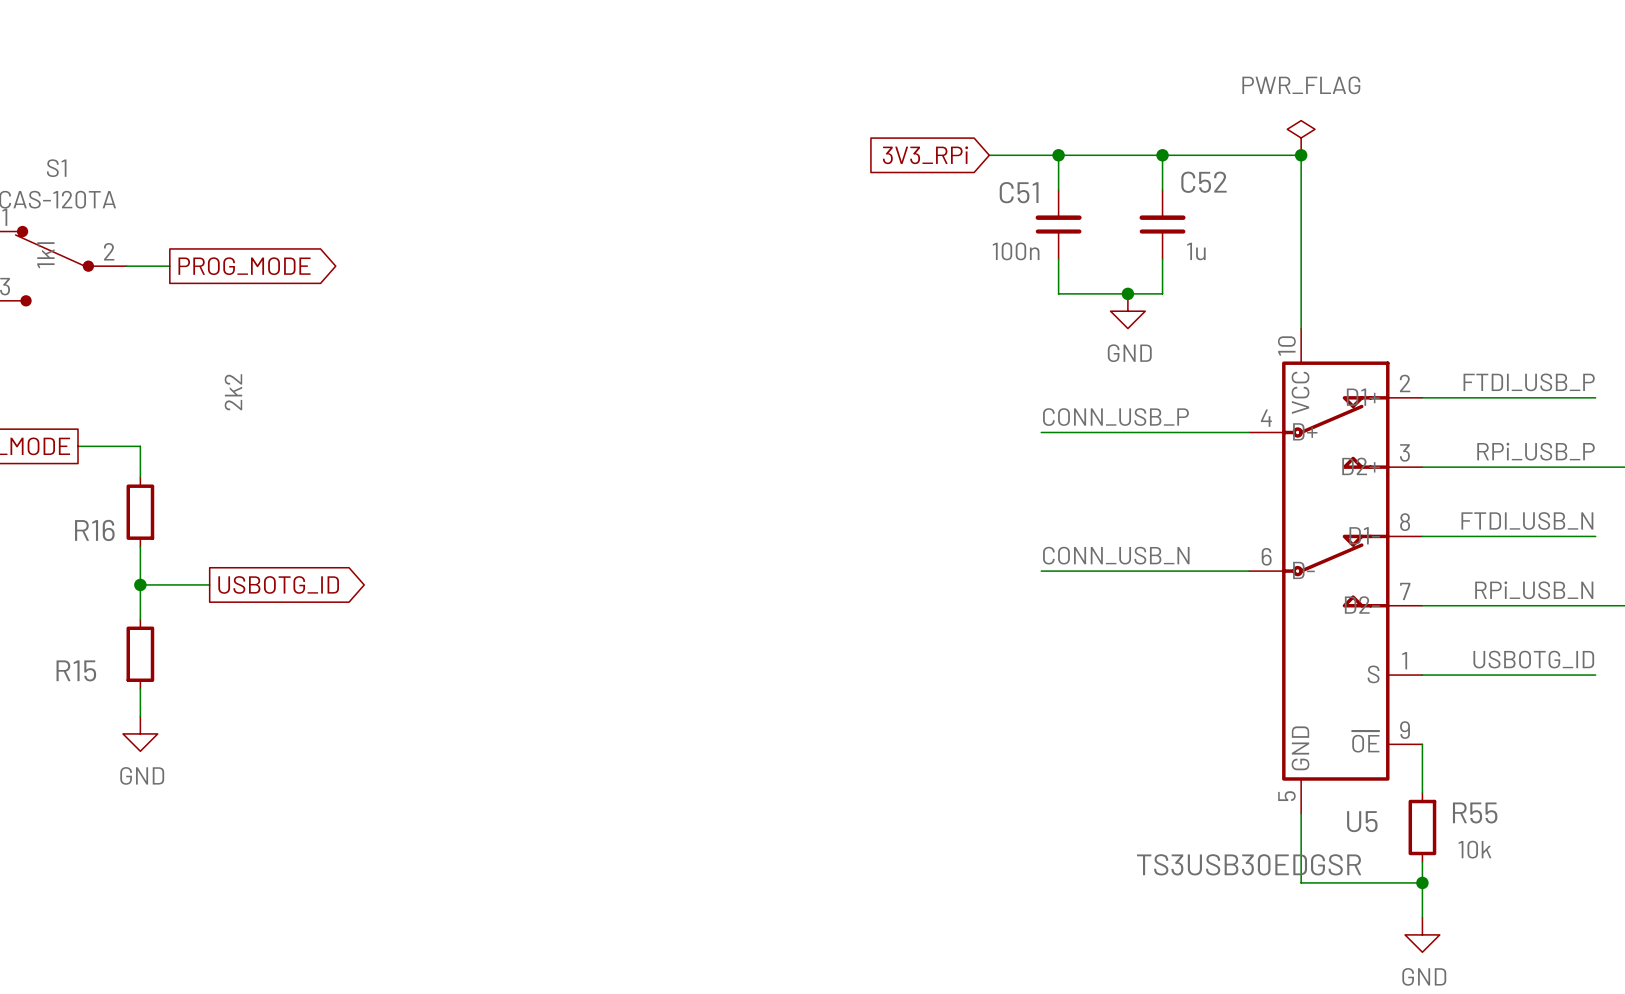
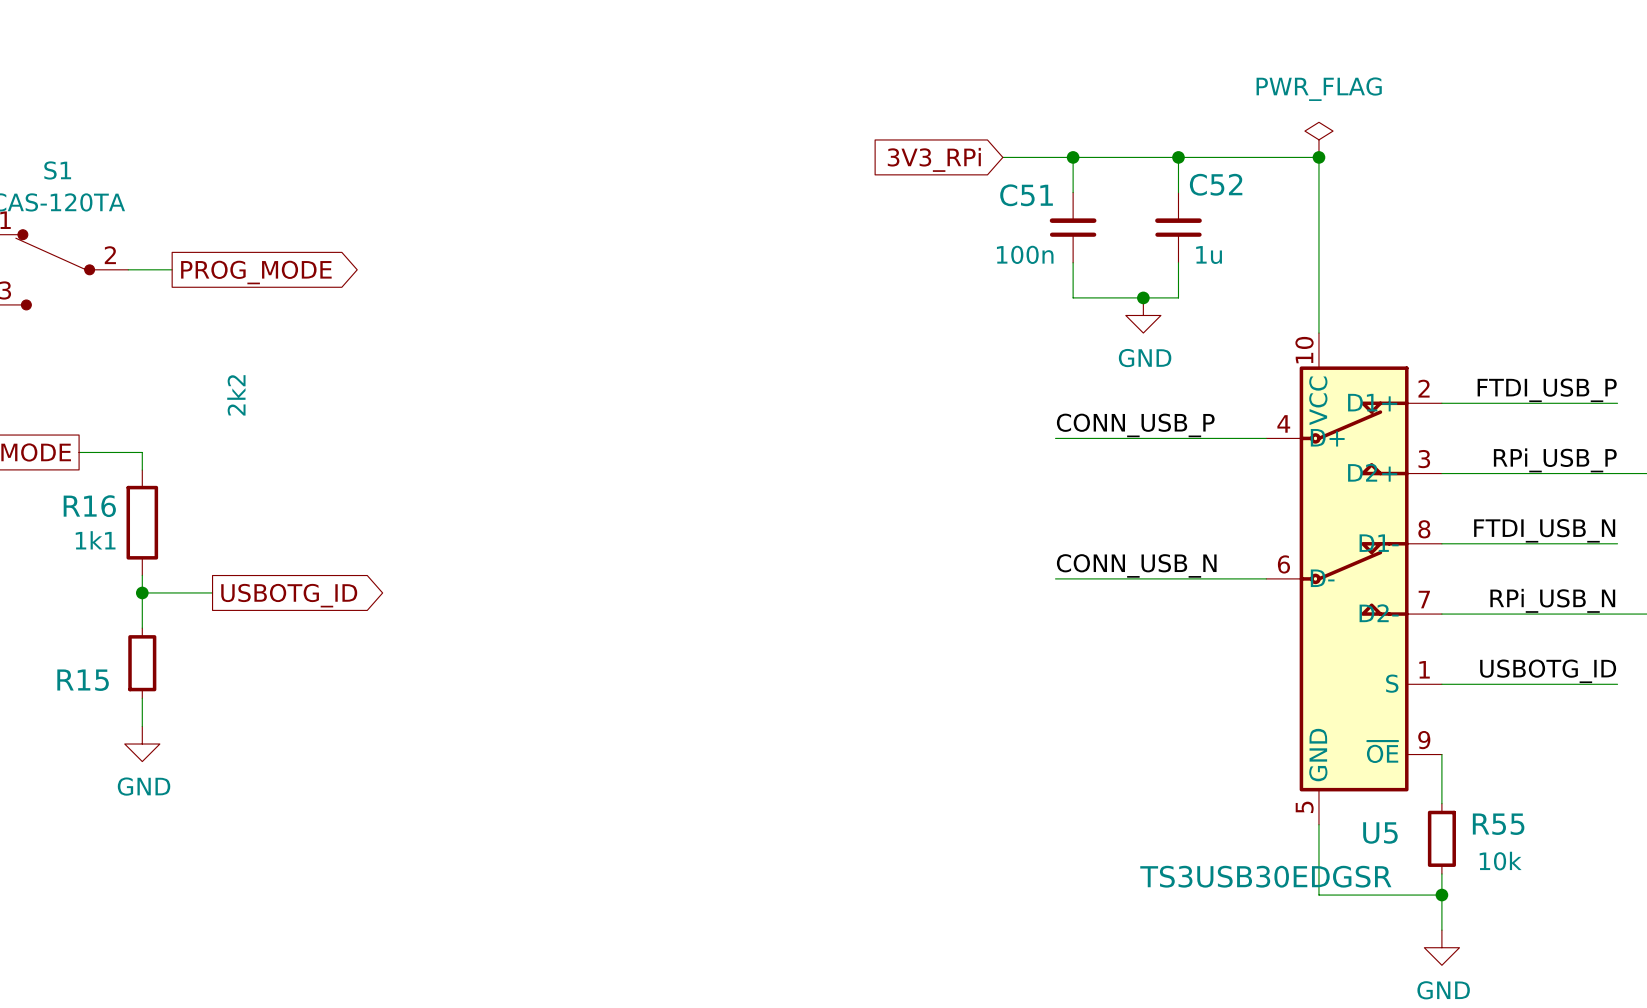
R16 text position: 1k1 (45, 255) -> 1k1 (95, 540)
R16 symbol: [126, 477, 155, 547] -> [126, 470, 159, 576]
R16 name position: R16 (94, 530) -> R16 (89, 506)

